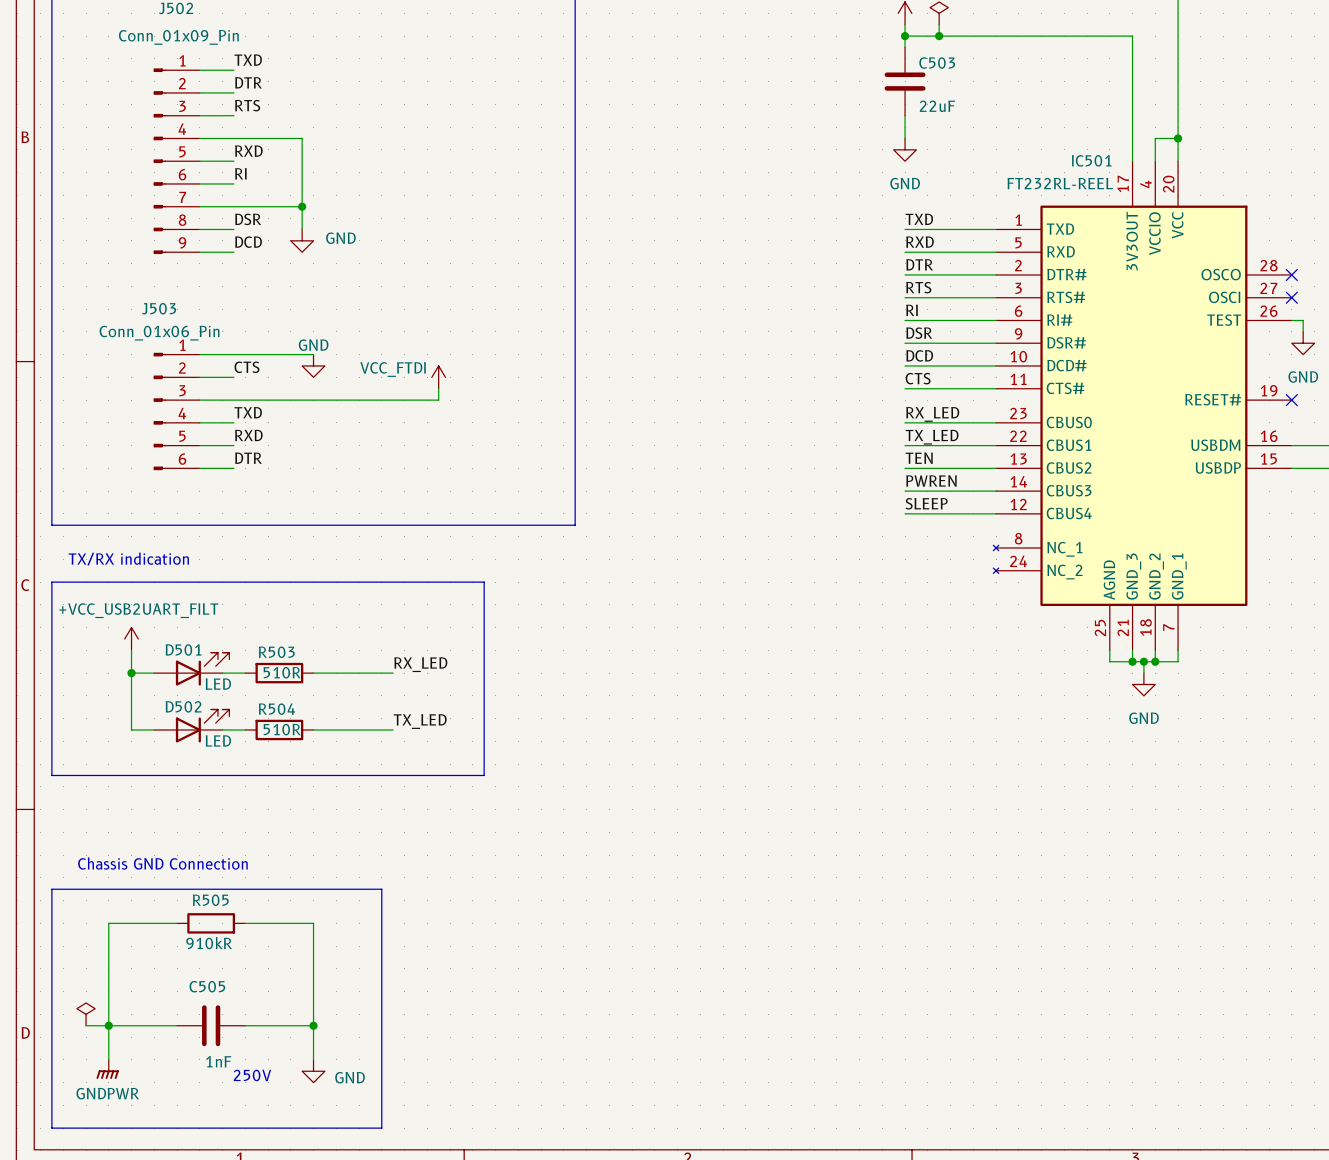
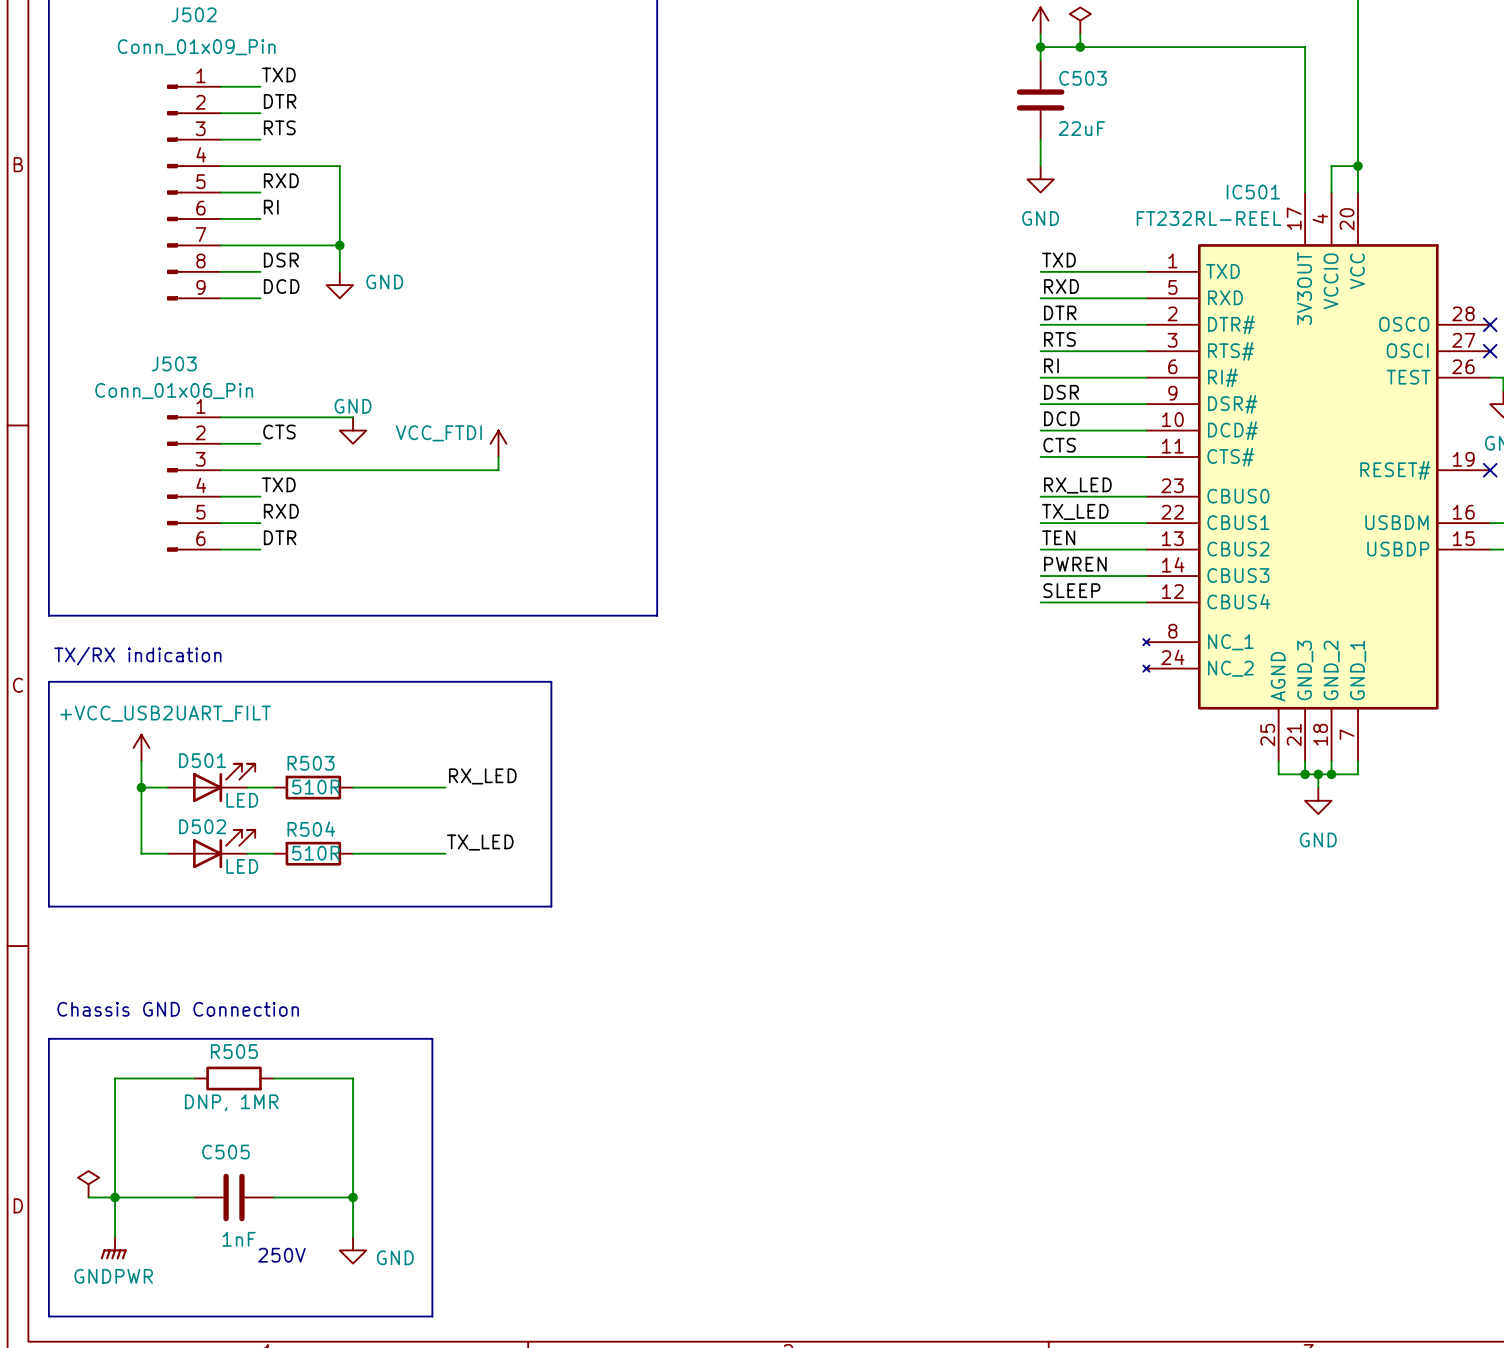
R505 value: 910kR (209, 943) -> DNP, 1MR (231, 1102)

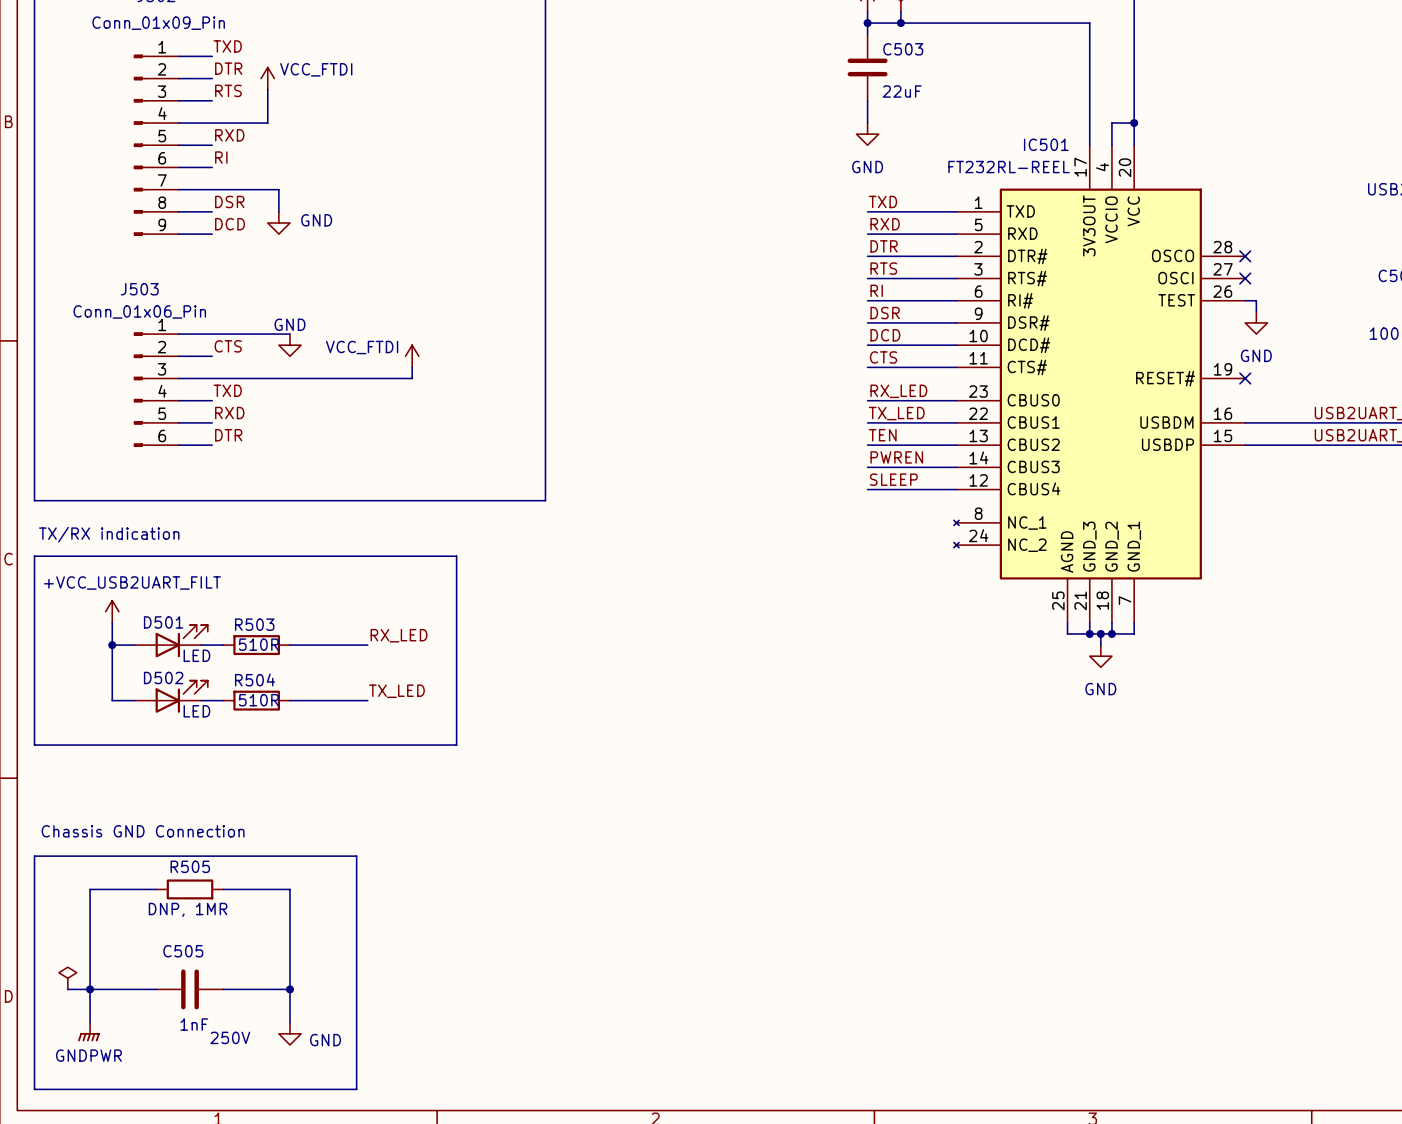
power symbol: none -> VCC_FTDI (267, 78)
wire: (326, 166) (339, 166) (339, 245) -> (267, 123) (267, 89)
junction: (339, 245) -> none

